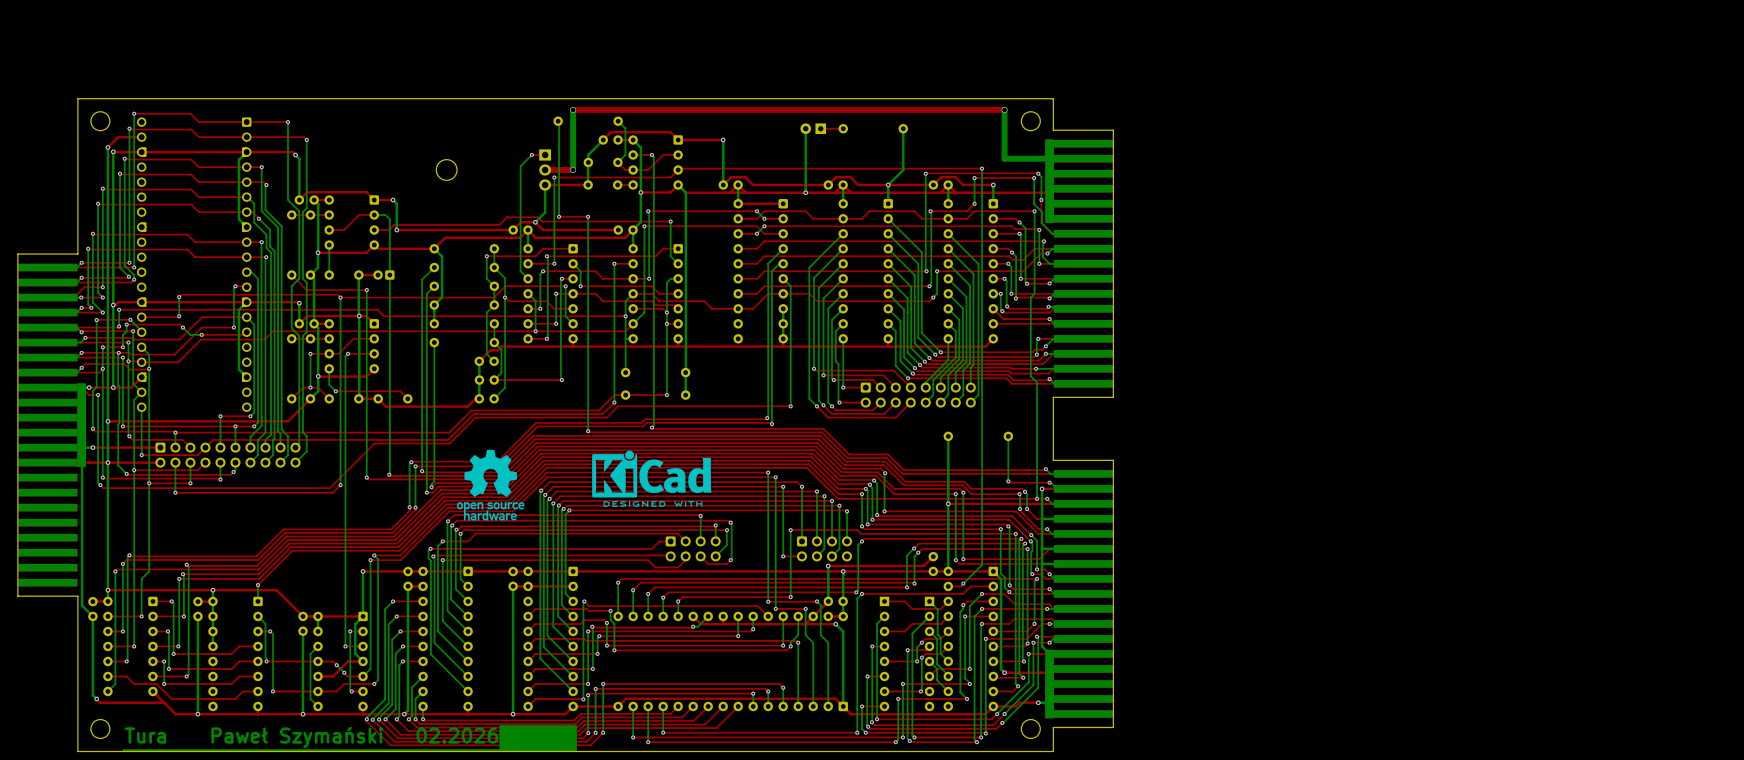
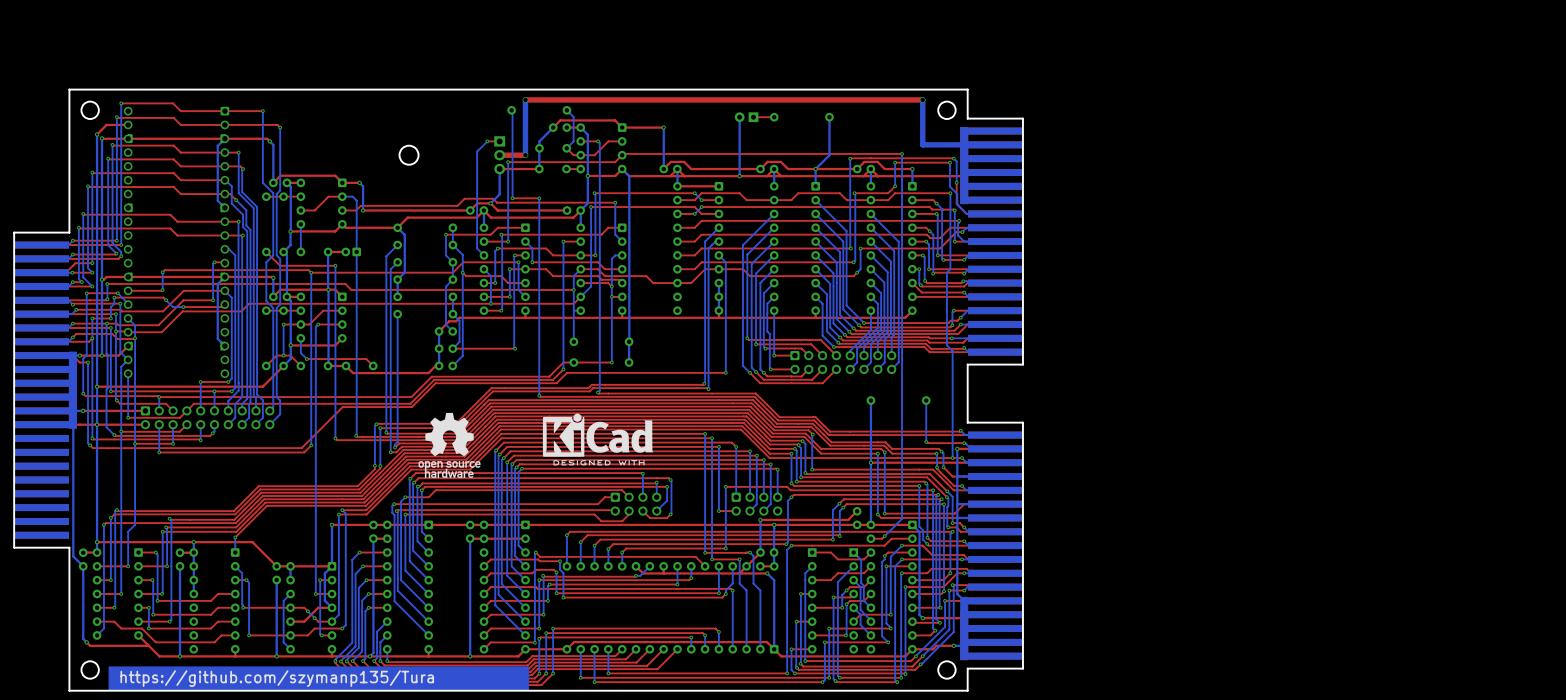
drawing: none -> [108, 666, 530, 691]
drawing: [122, 725, 578, 752] -> none
text: Tura Paweł Szymański 02.2026 (311, 737) -> none
text: none -> https://github.com/szymanp135/Tura (277, 678)

